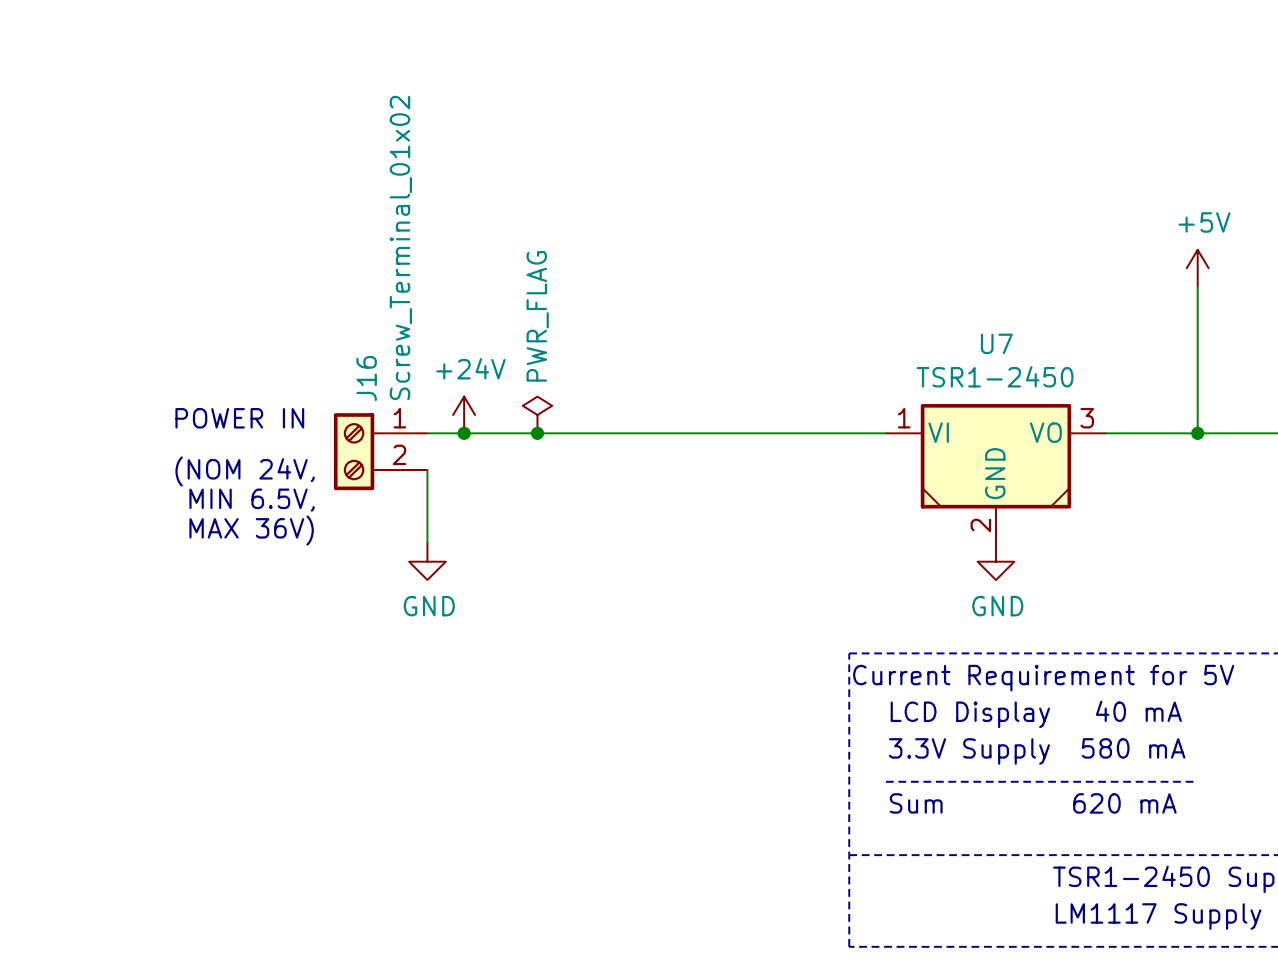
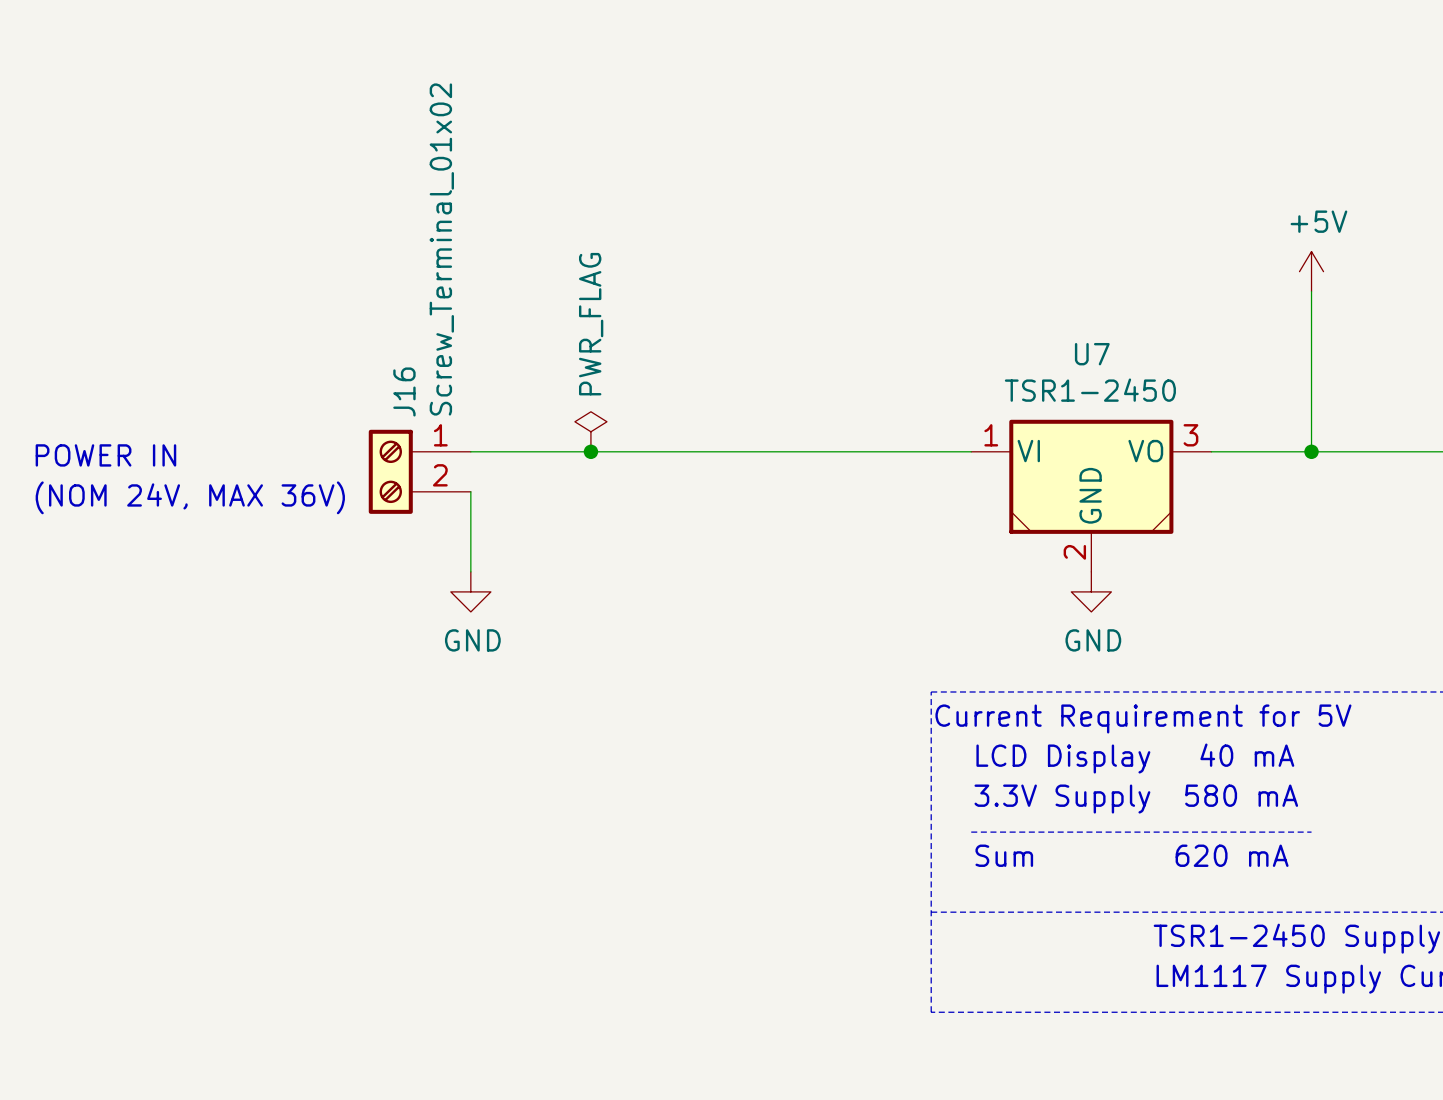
power symbol: +24V (464, 414) -> none
text position: POWER IN (239, 418) -> POWER IN (105, 455)
junction: (464, 433) -> none
text: (NOM 24V, (245, 471) -> (NOM 24V, MAX 36V) (190, 497)
text: MIN 6.5V, (252, 500) -> none
text: MAX 36V) (251, 530) -> none

